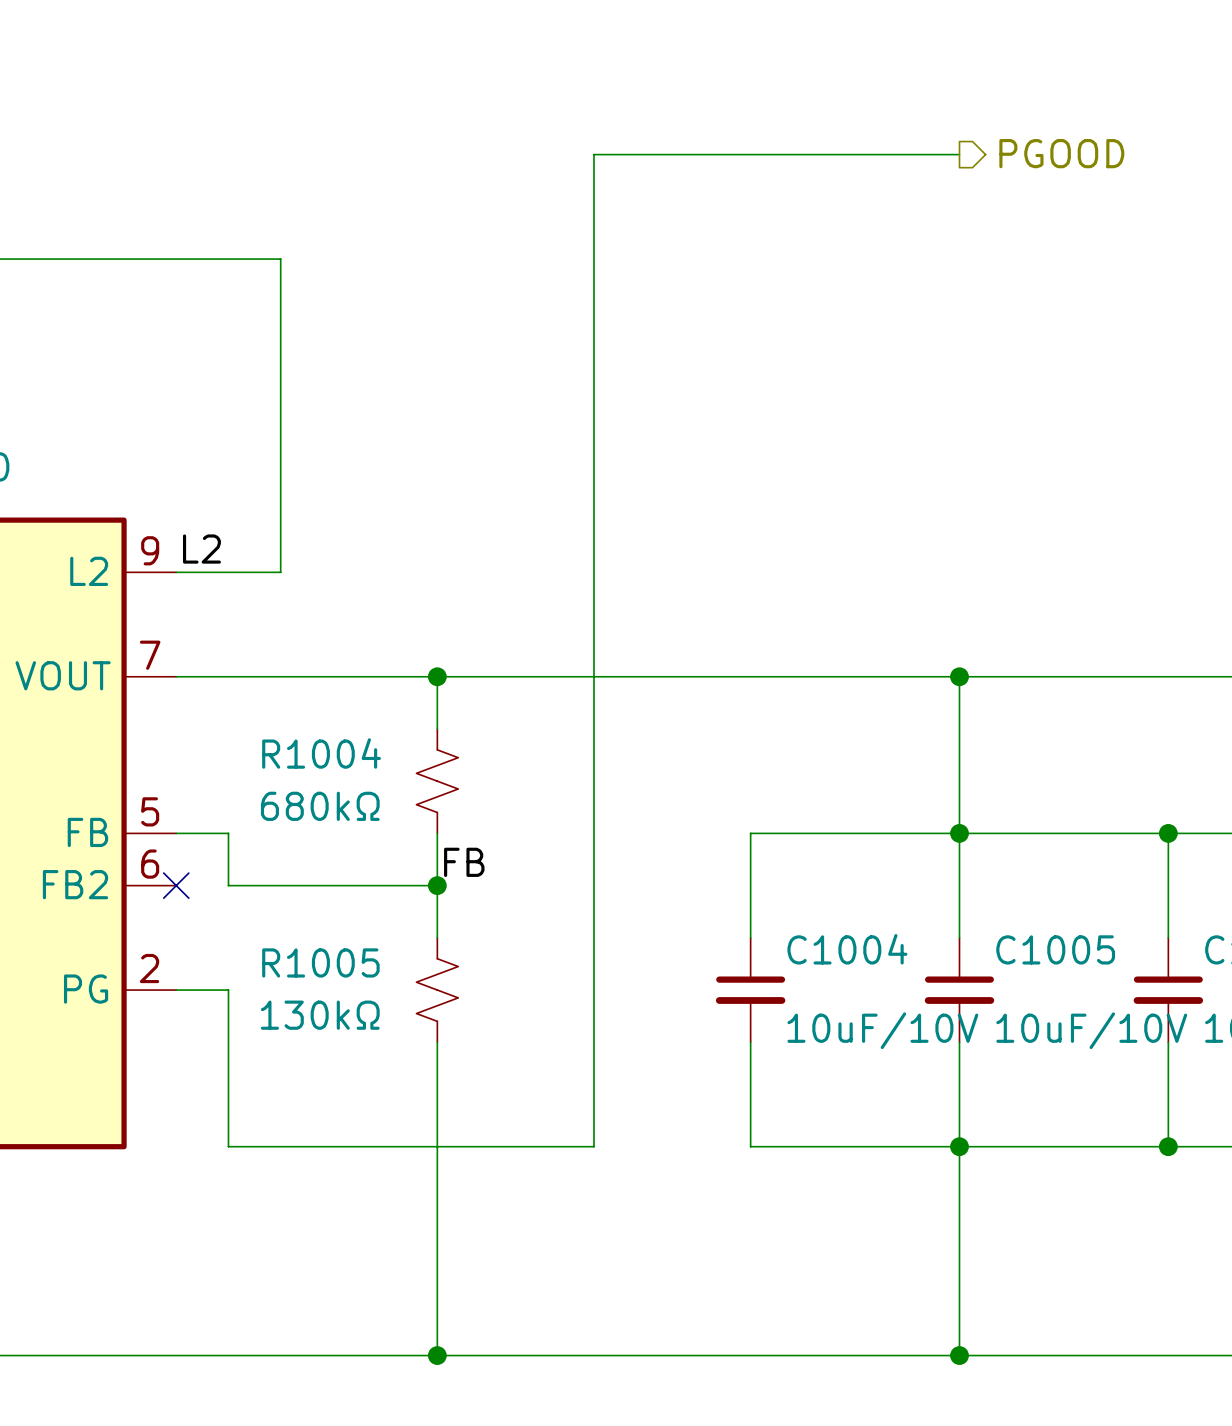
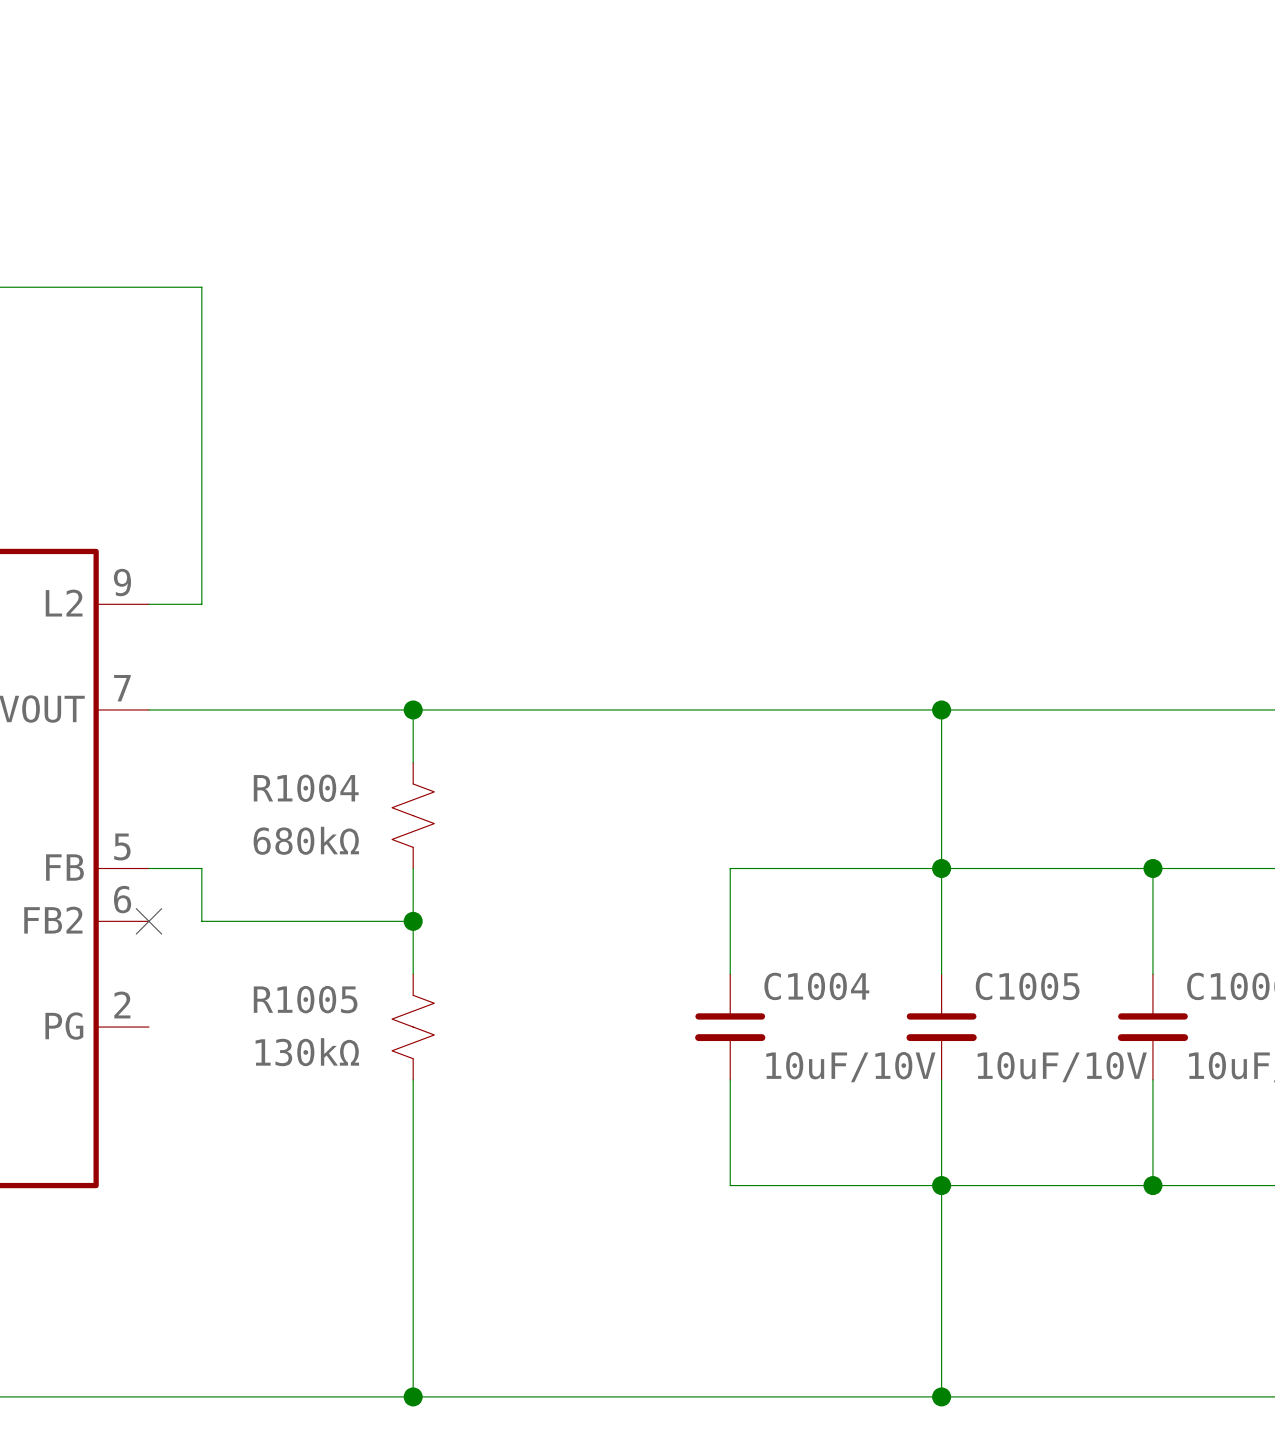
hierarchical label: PGOOD (1061, 153) -> none
wire: (959, 154) (593, 154) (593, 1146) (228, 1146) (228, 990) (176, 990) -> none
wire: (228, 259) (280, 259) (280, 572) (228, 572) -> (201, 287) (201, 604)
label: L2 (201, 549) -> none
label: FB (464, 862) -> none

